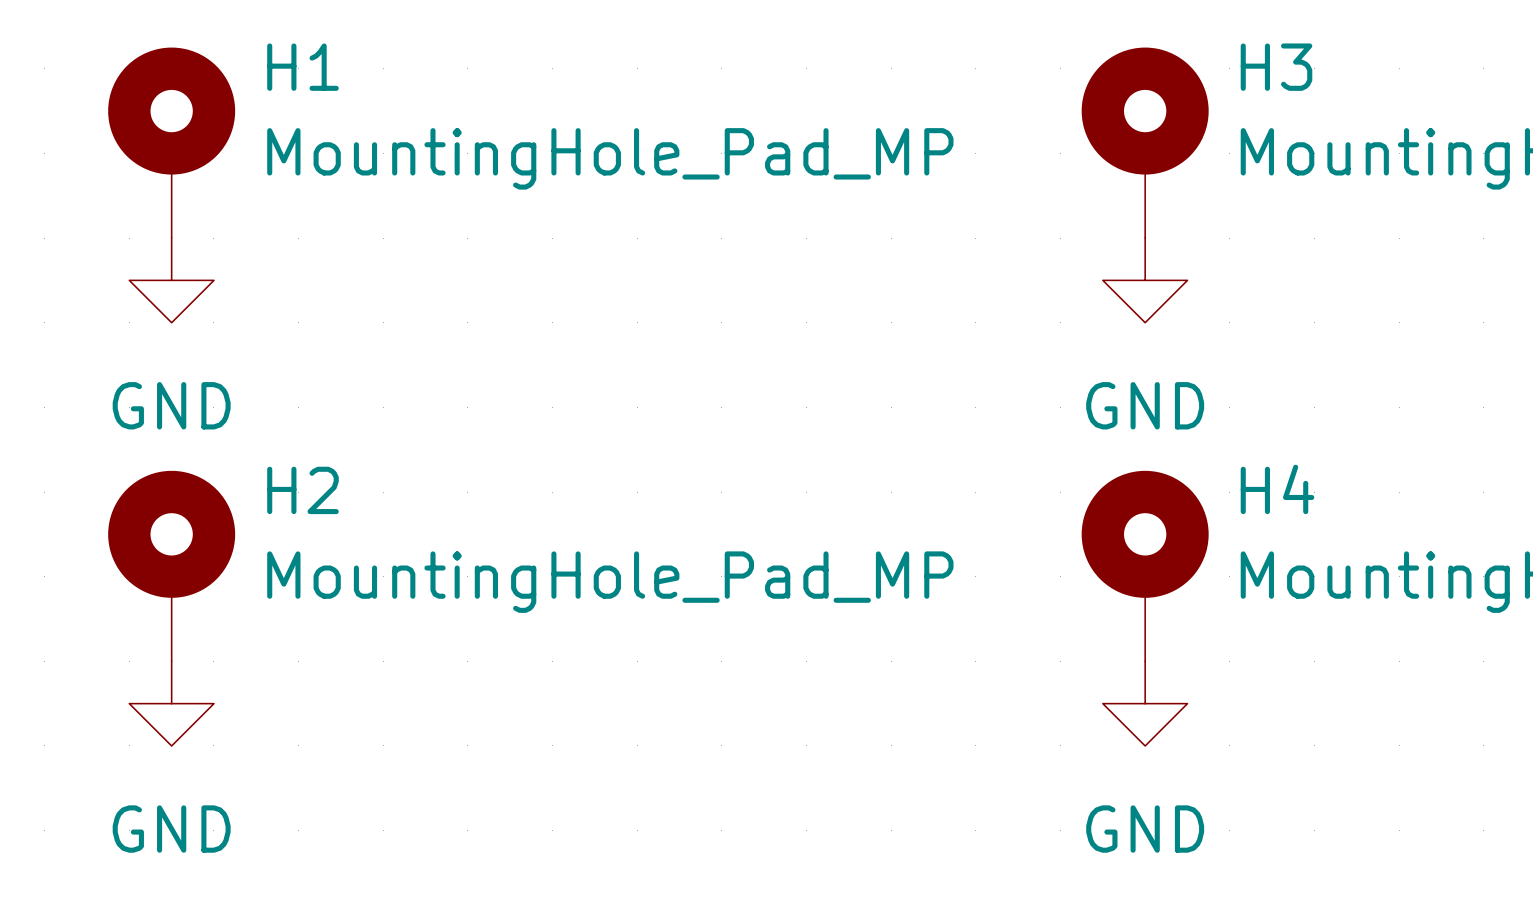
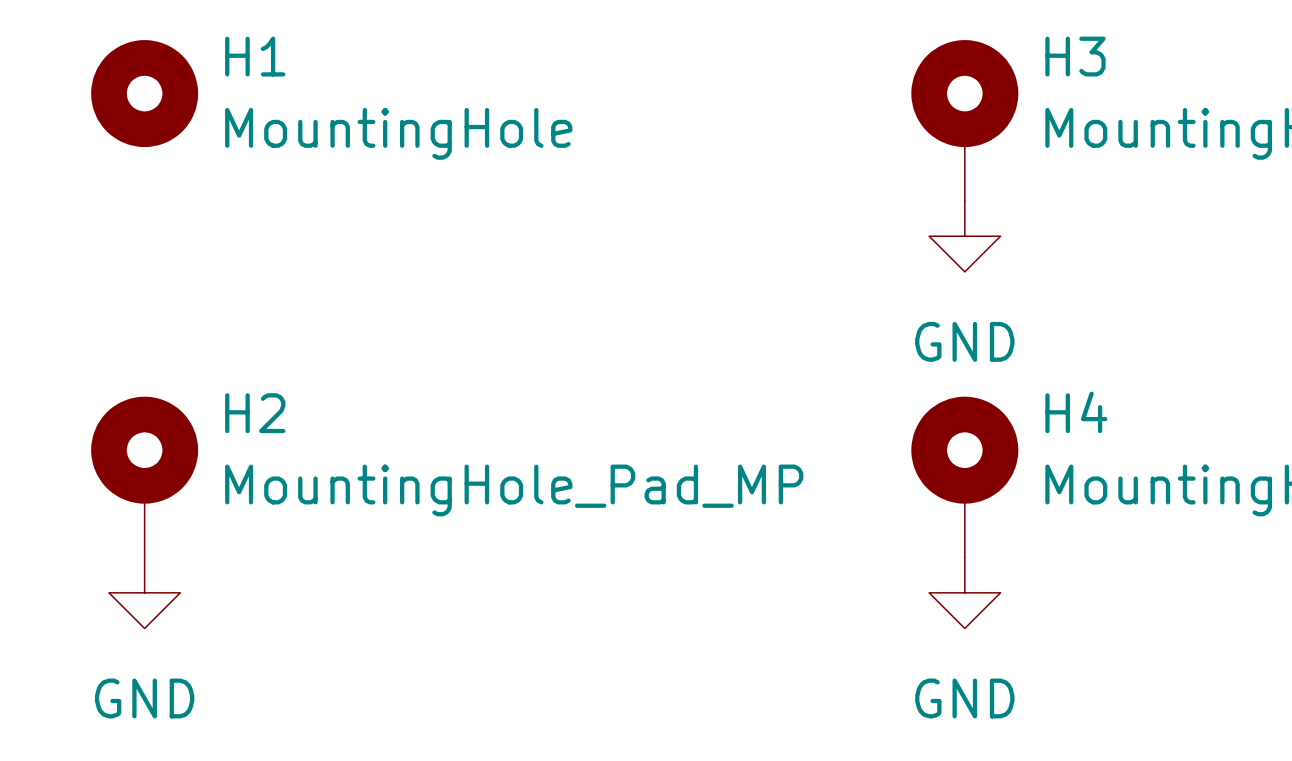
H1 symbol: [108, 47, 236, 239] -> [91, 40, 199, 148]
H1 value: MountingHole_Pad_MP (610, 158) -> MountingHole (398, 133)
power symbol: GND (171, 280) -> none

